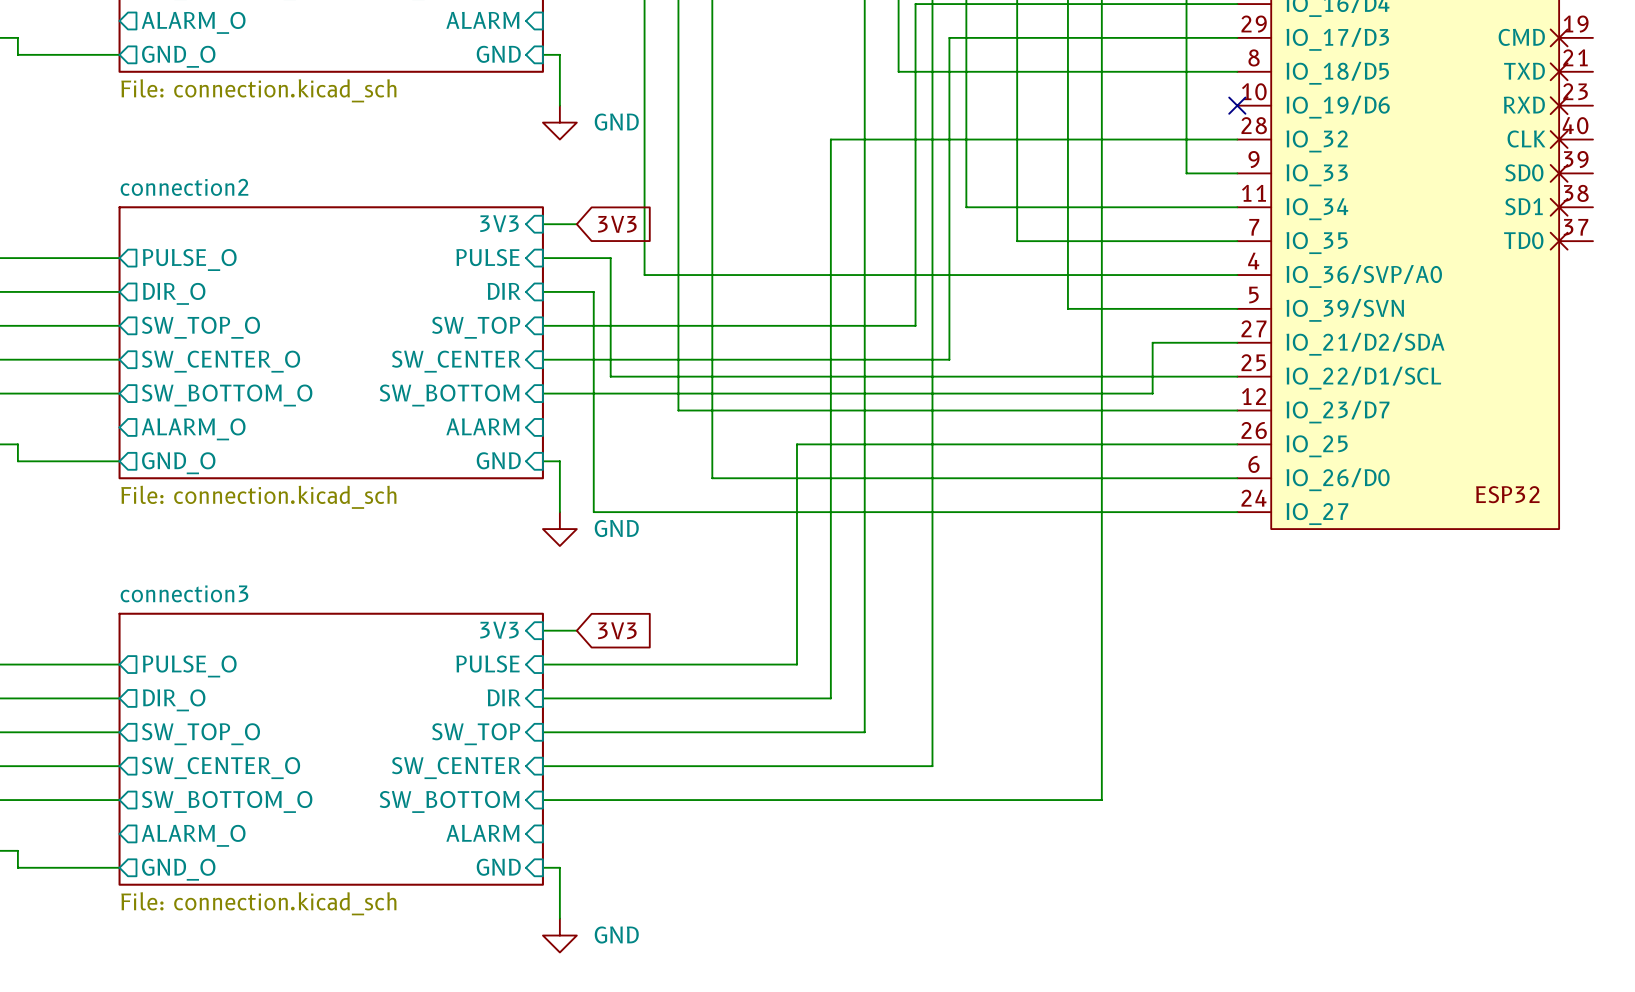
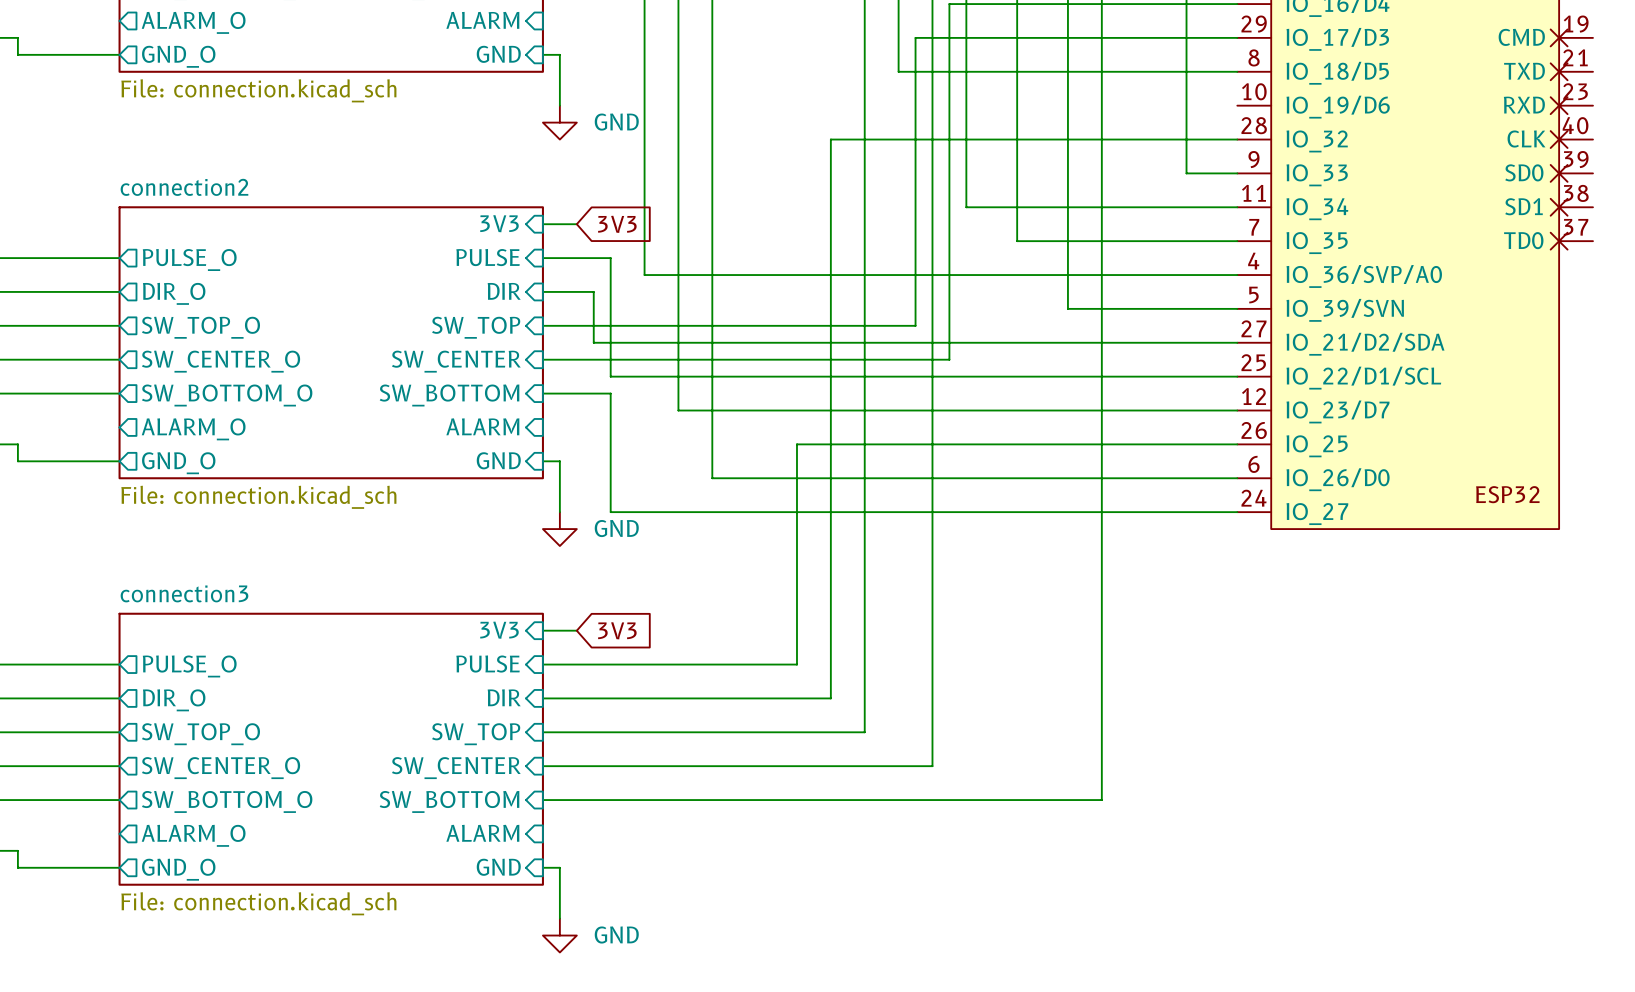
wire: (949, 4) (915, 4) (915, 37) -> (949, 4) (949, 37) (915, 37)
no-connect mark: (1237, 105) -> none
wire: (593, 342) (593, 512) (610, 512) -> (610, 393) (610, 512)
wire: (1152, 342) (1152, 393) (610, 393) -> (1152, 342) (593, 342)

